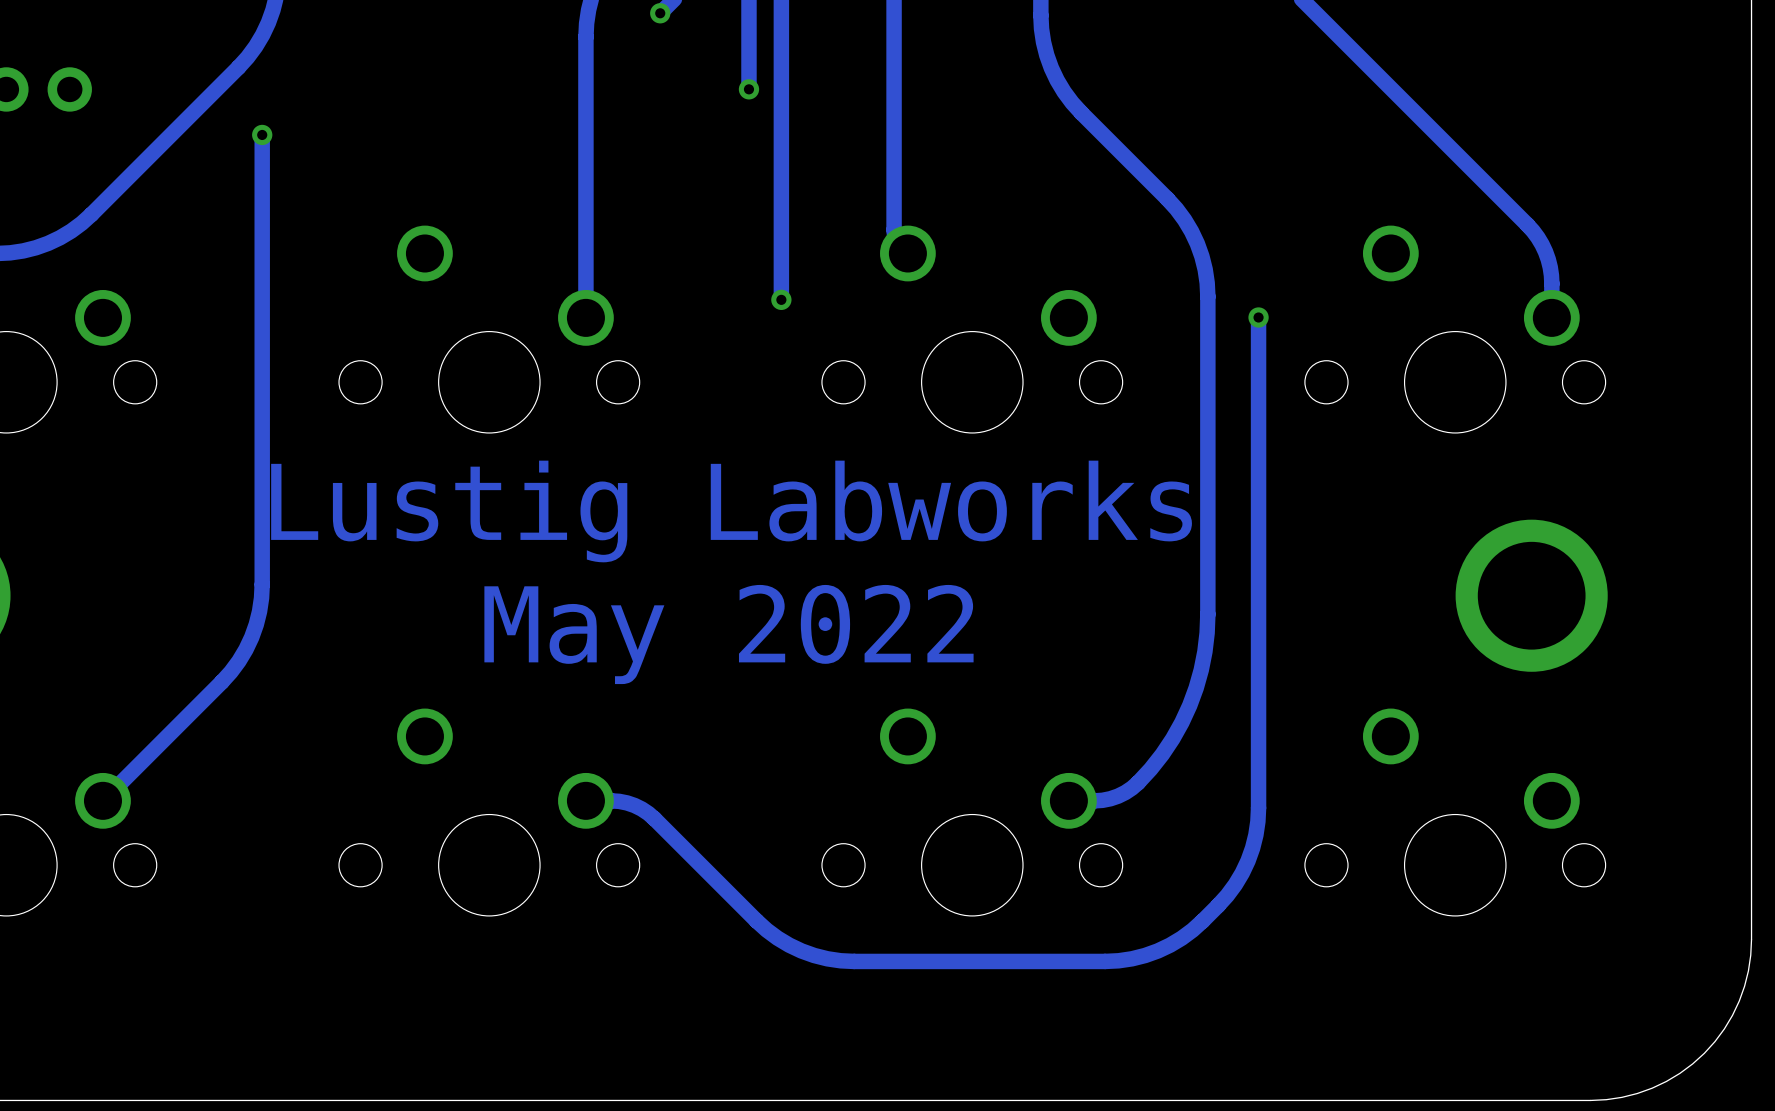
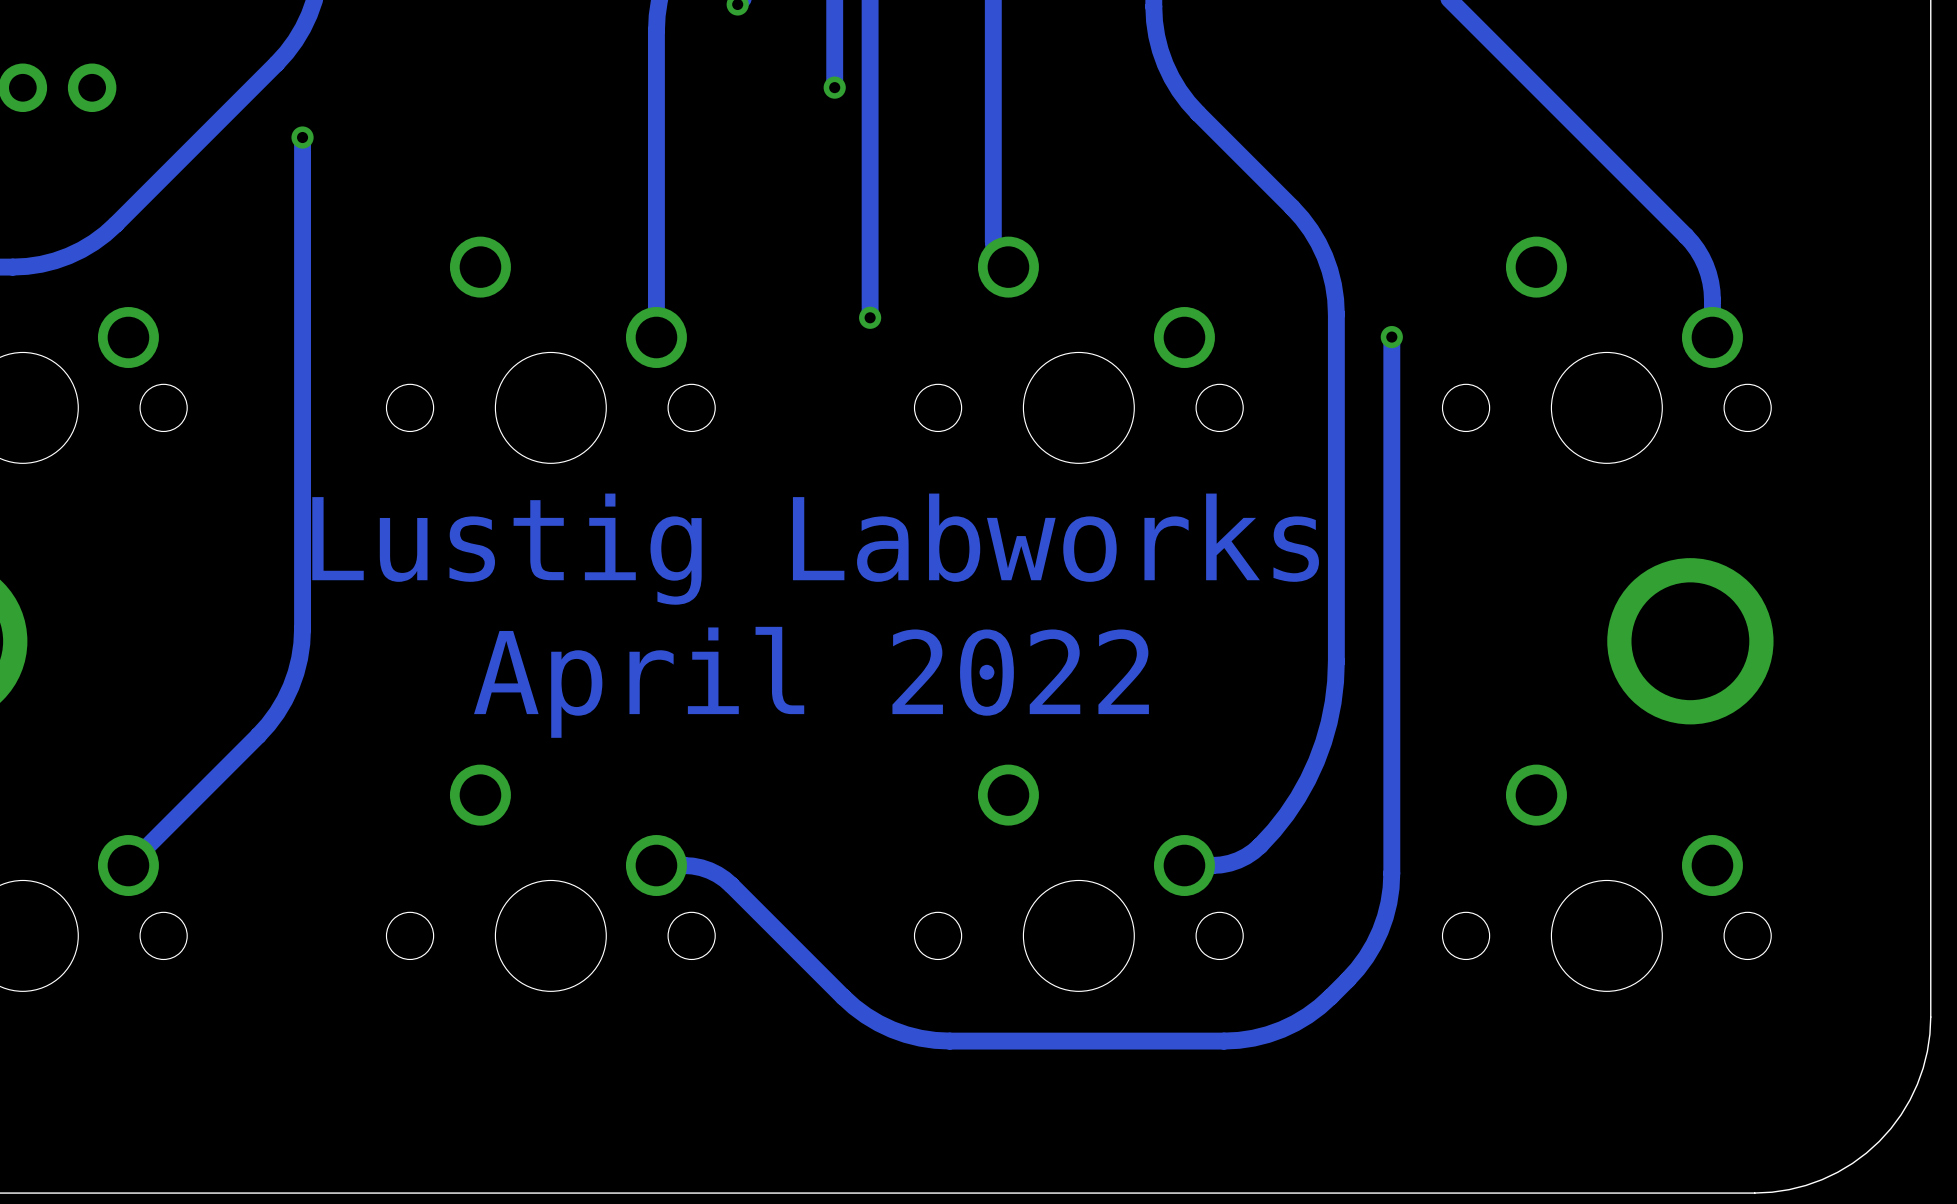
text: May 2022 (728, 634) -> April 2022 (811, 682)

